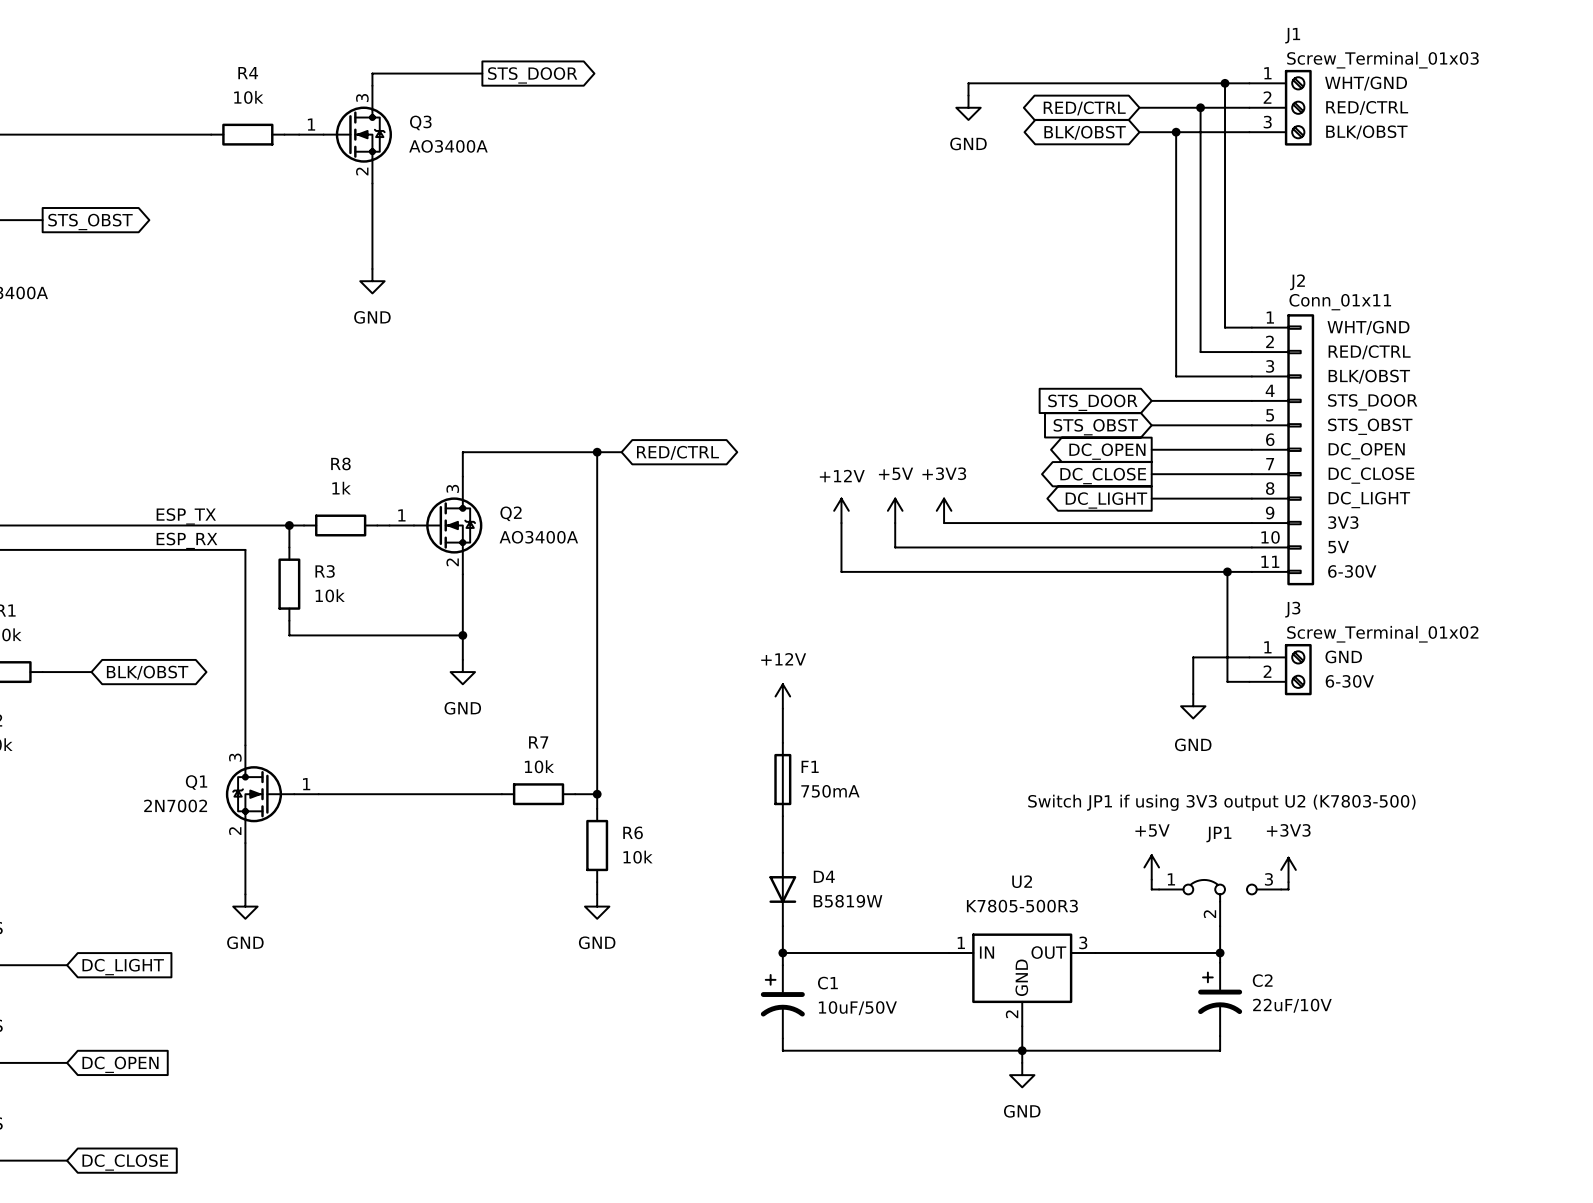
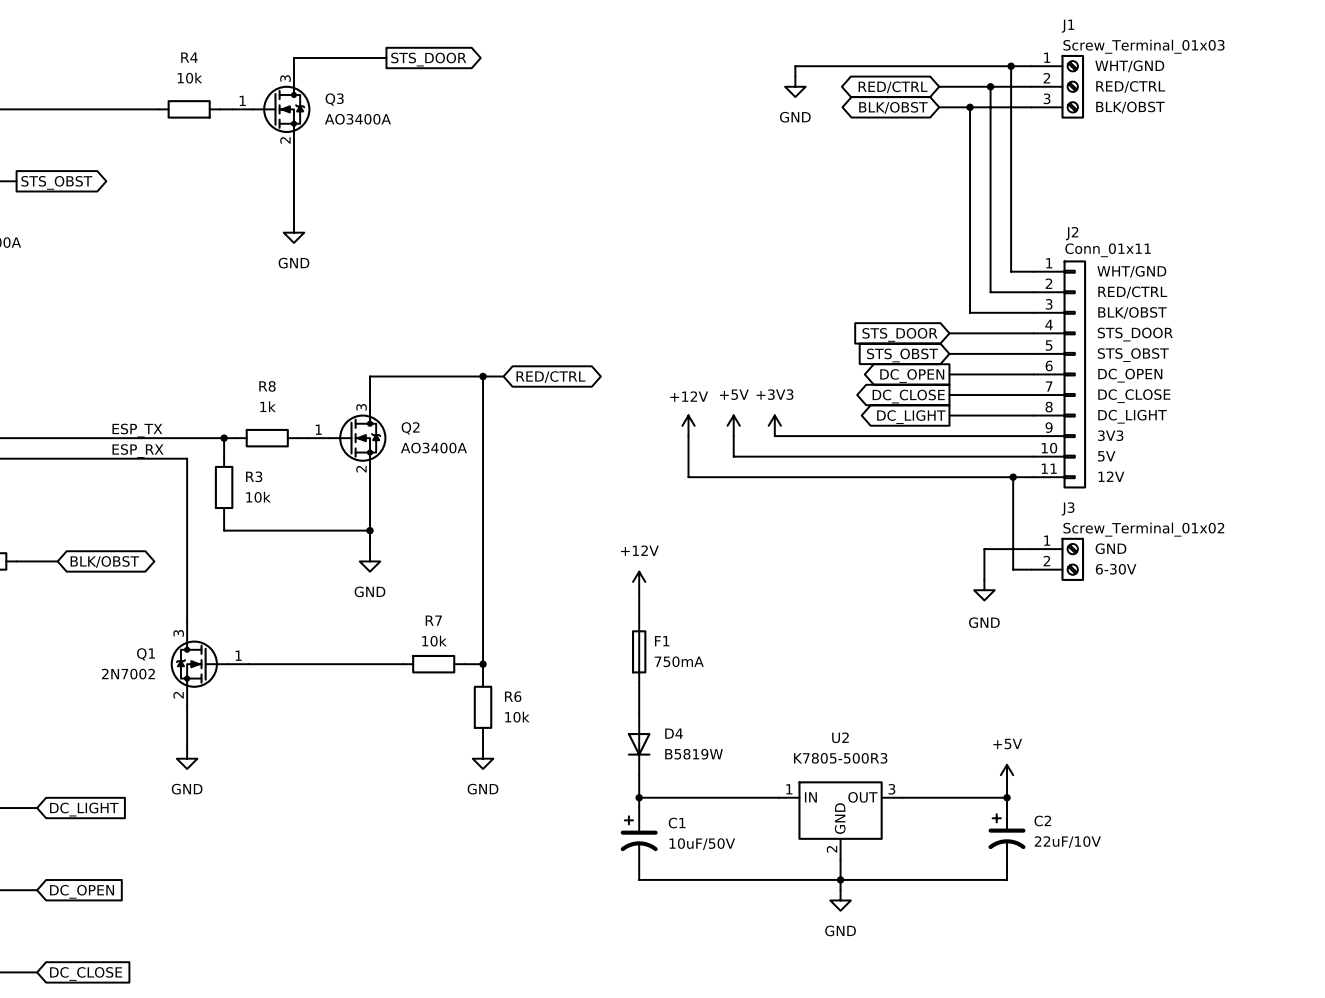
J2 pin name: 6-30V (1352, 571) -> 12V (1111, 476)
text: Switch JP1 if using 3V3 output U2 (K7803-500) (1221, 802) -> none
power symbol position: +5V (1151, 867) -> +5V (1007, 775)
power symbol: +3V3 (1288, 869) -> none
wire: (1151, 879) (1151, 889) (1159, 889) -> none
wire: (1288, 882) (1288, 889) (1281, 889) -> none
JP1: (1220, 903) -> none

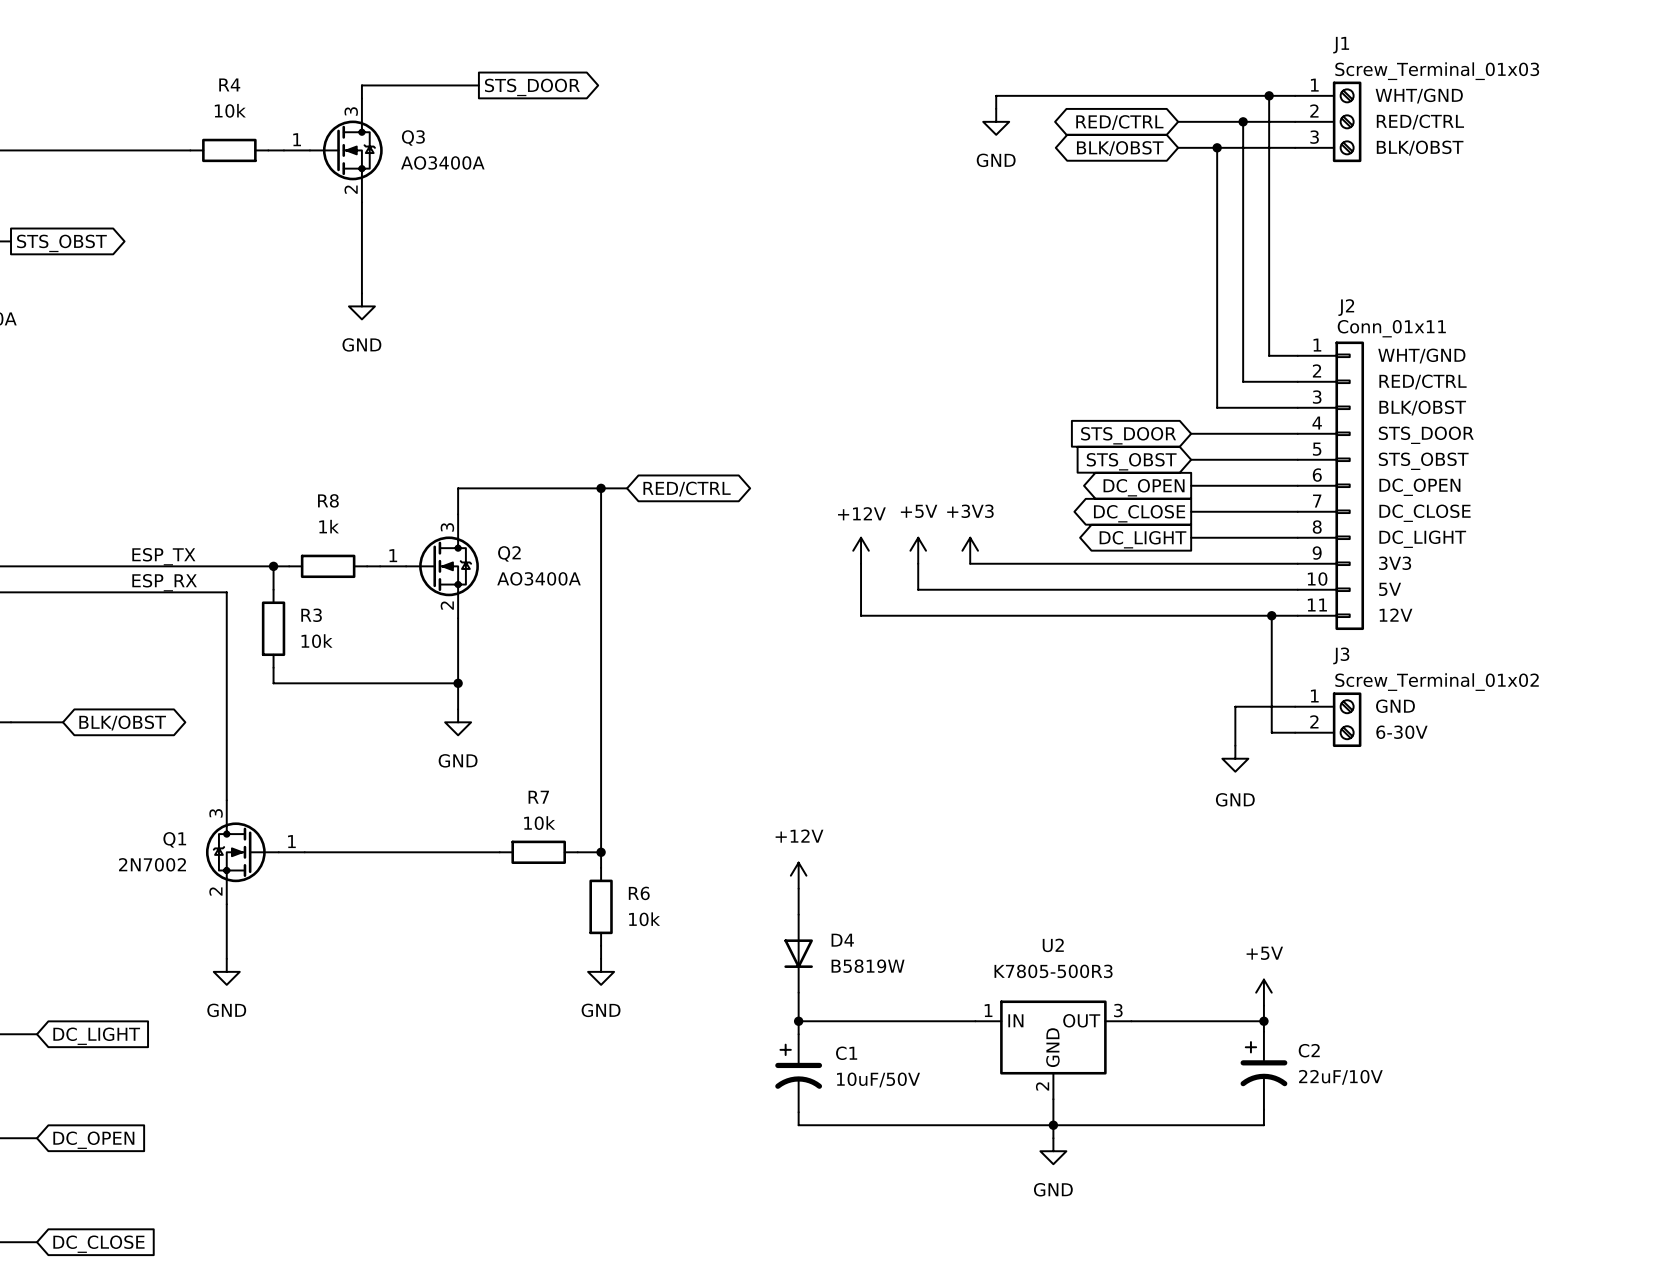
power symbol position: +12V (639, 581) -> +12V (798, 875)
wire: (639, 592) (639, 621) -> none
F1: 750mA (639, 651) -> none

